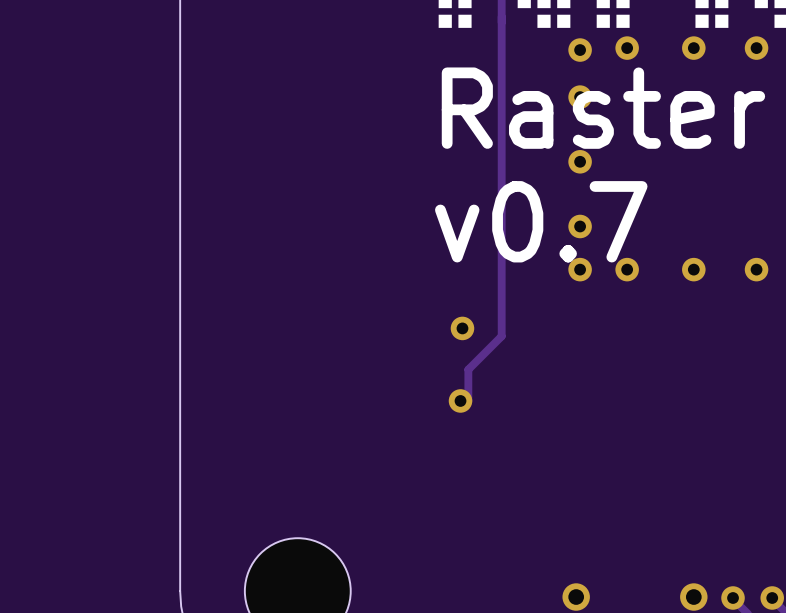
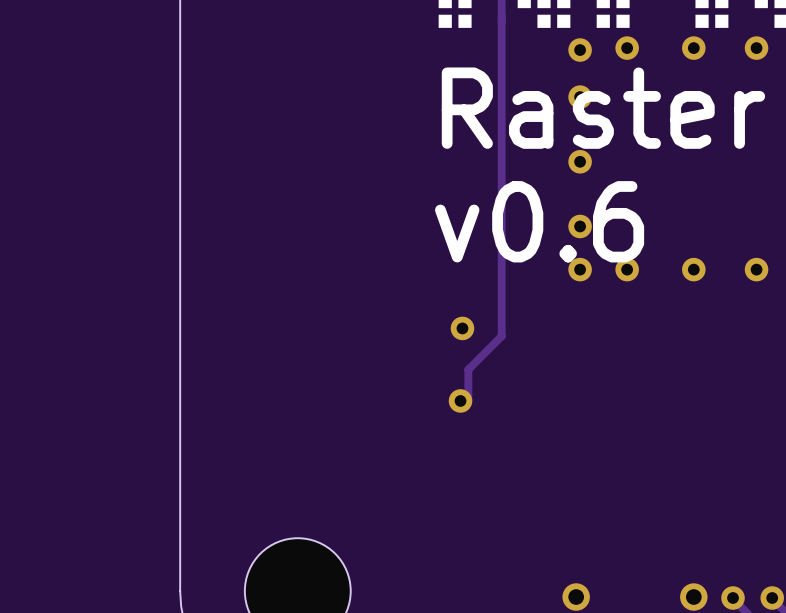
text: v0.7 (541, 221) -> v0.6 (539, 221)

